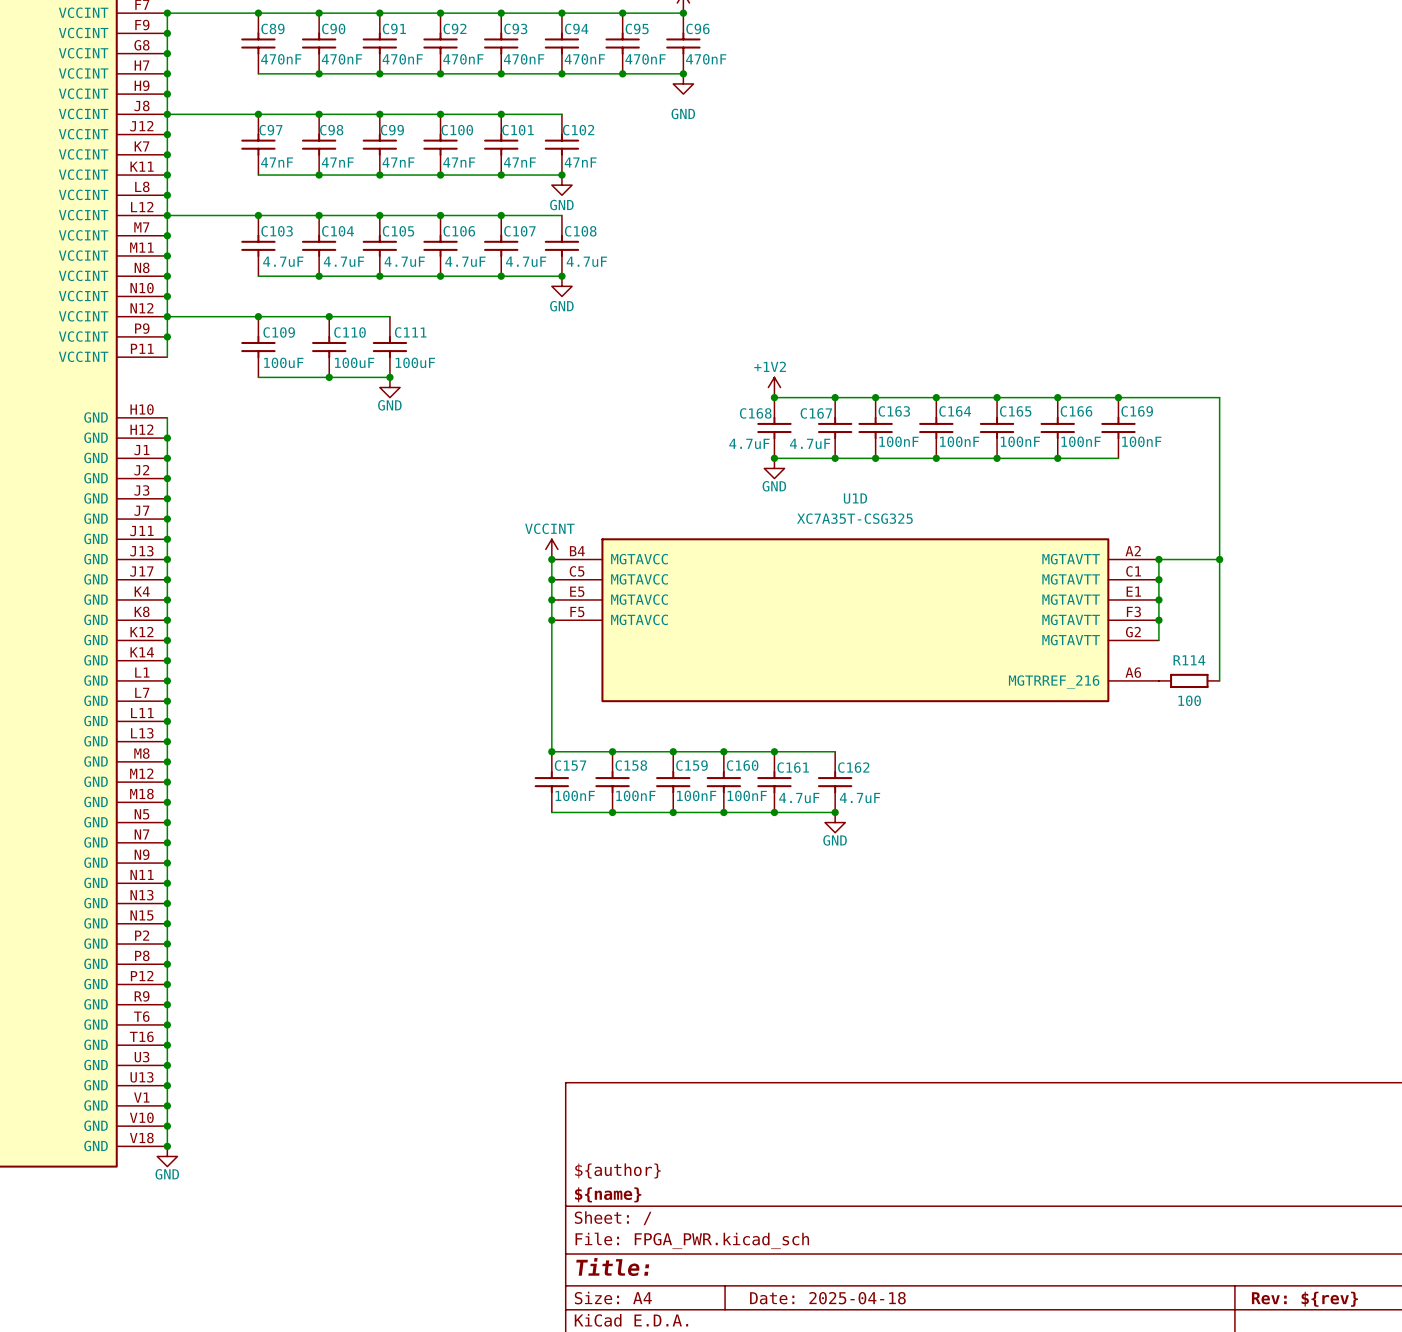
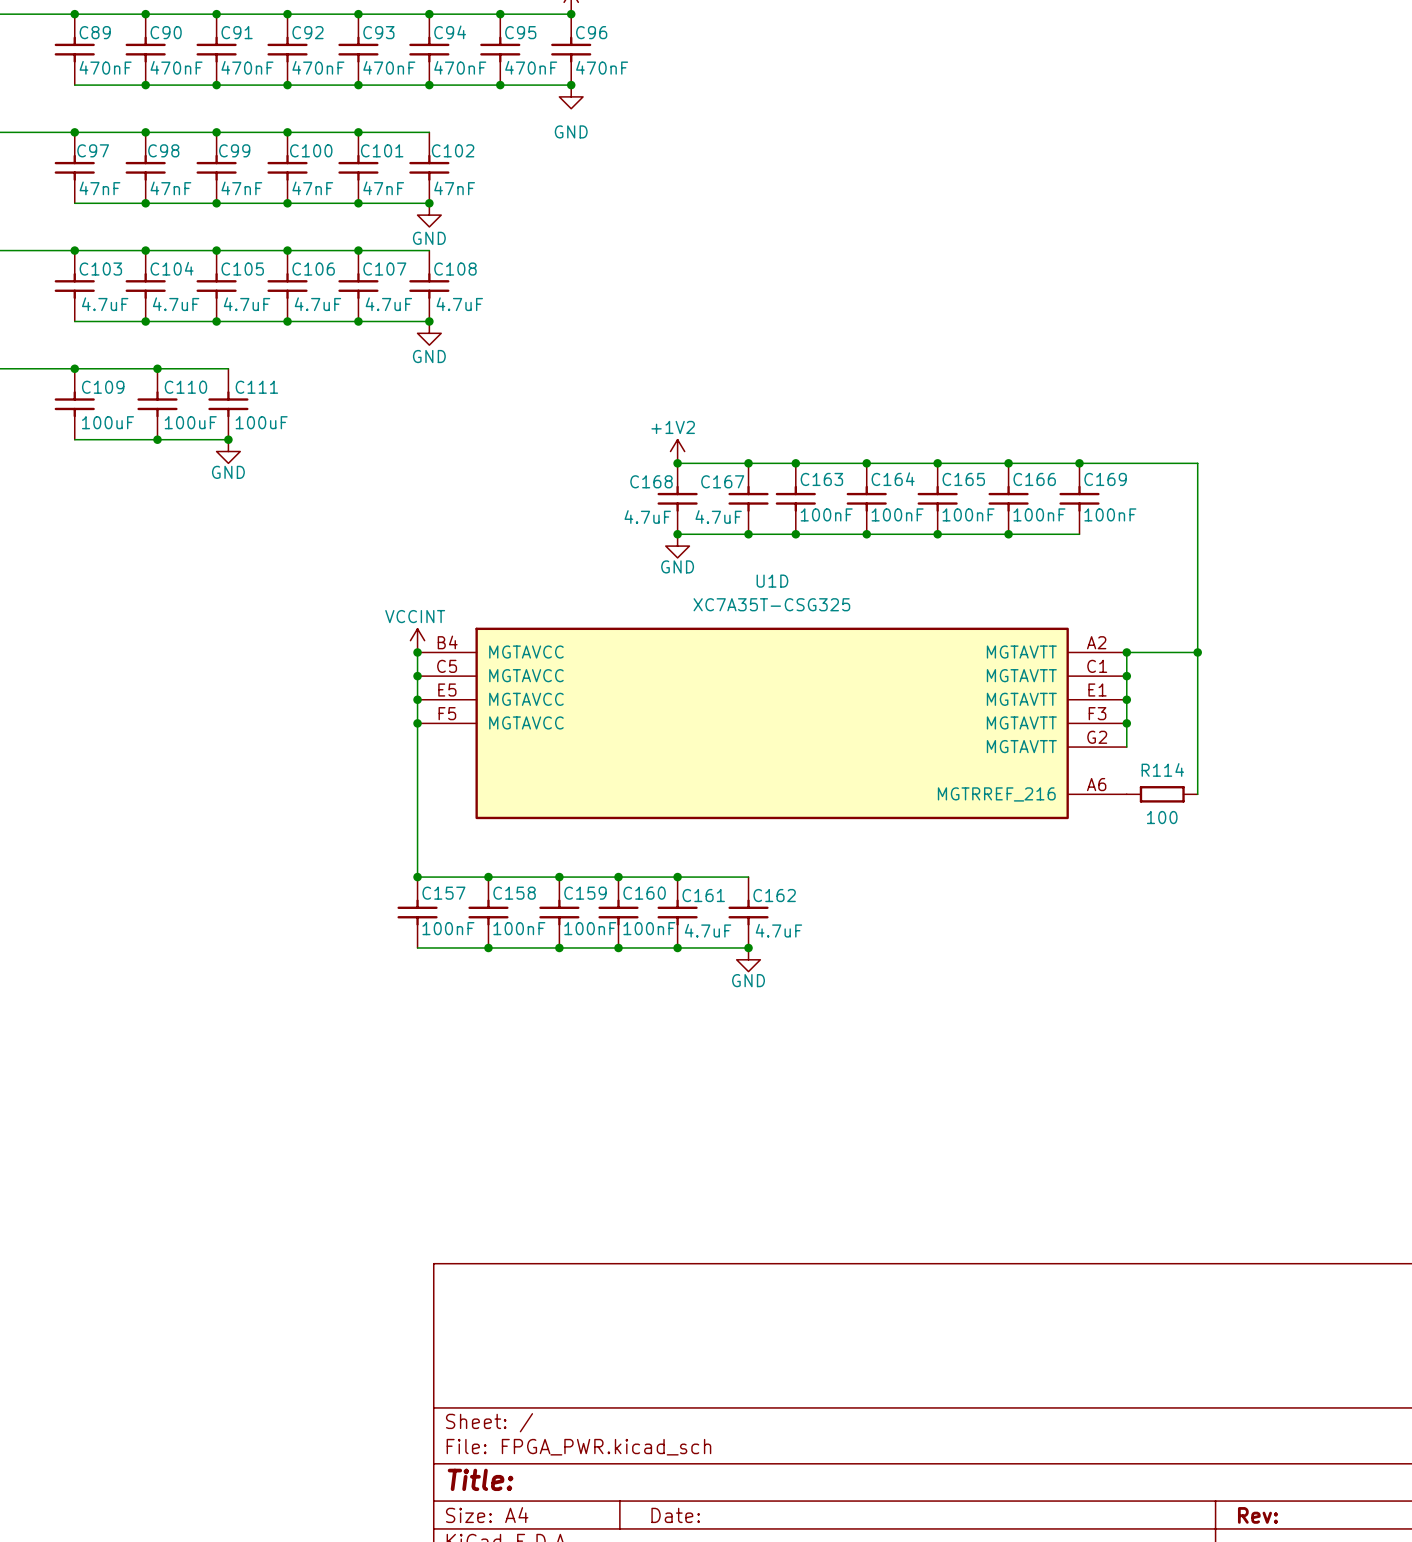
title block: ${author} (617, 1170) -> none
title block: ${name} (608, 1194) -> none
title block: Date: 2025-04-18 (827, 1298) -> Date: (675, 1515)
title block: Rev: ${rev} (1304, 1299) -> Rev: (1257, 1515)

